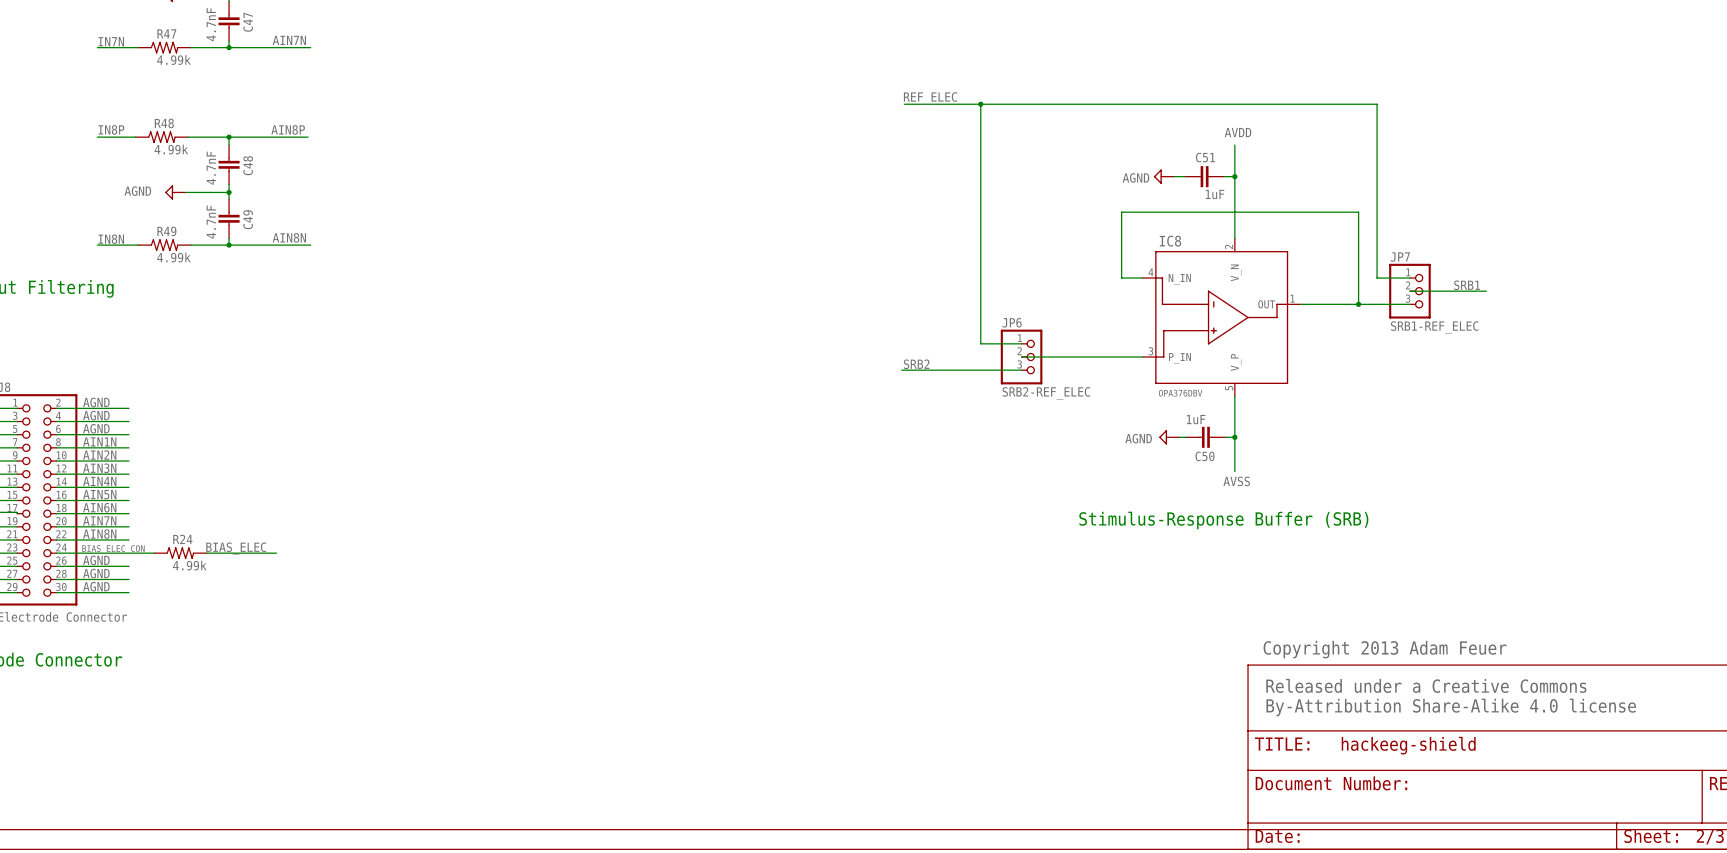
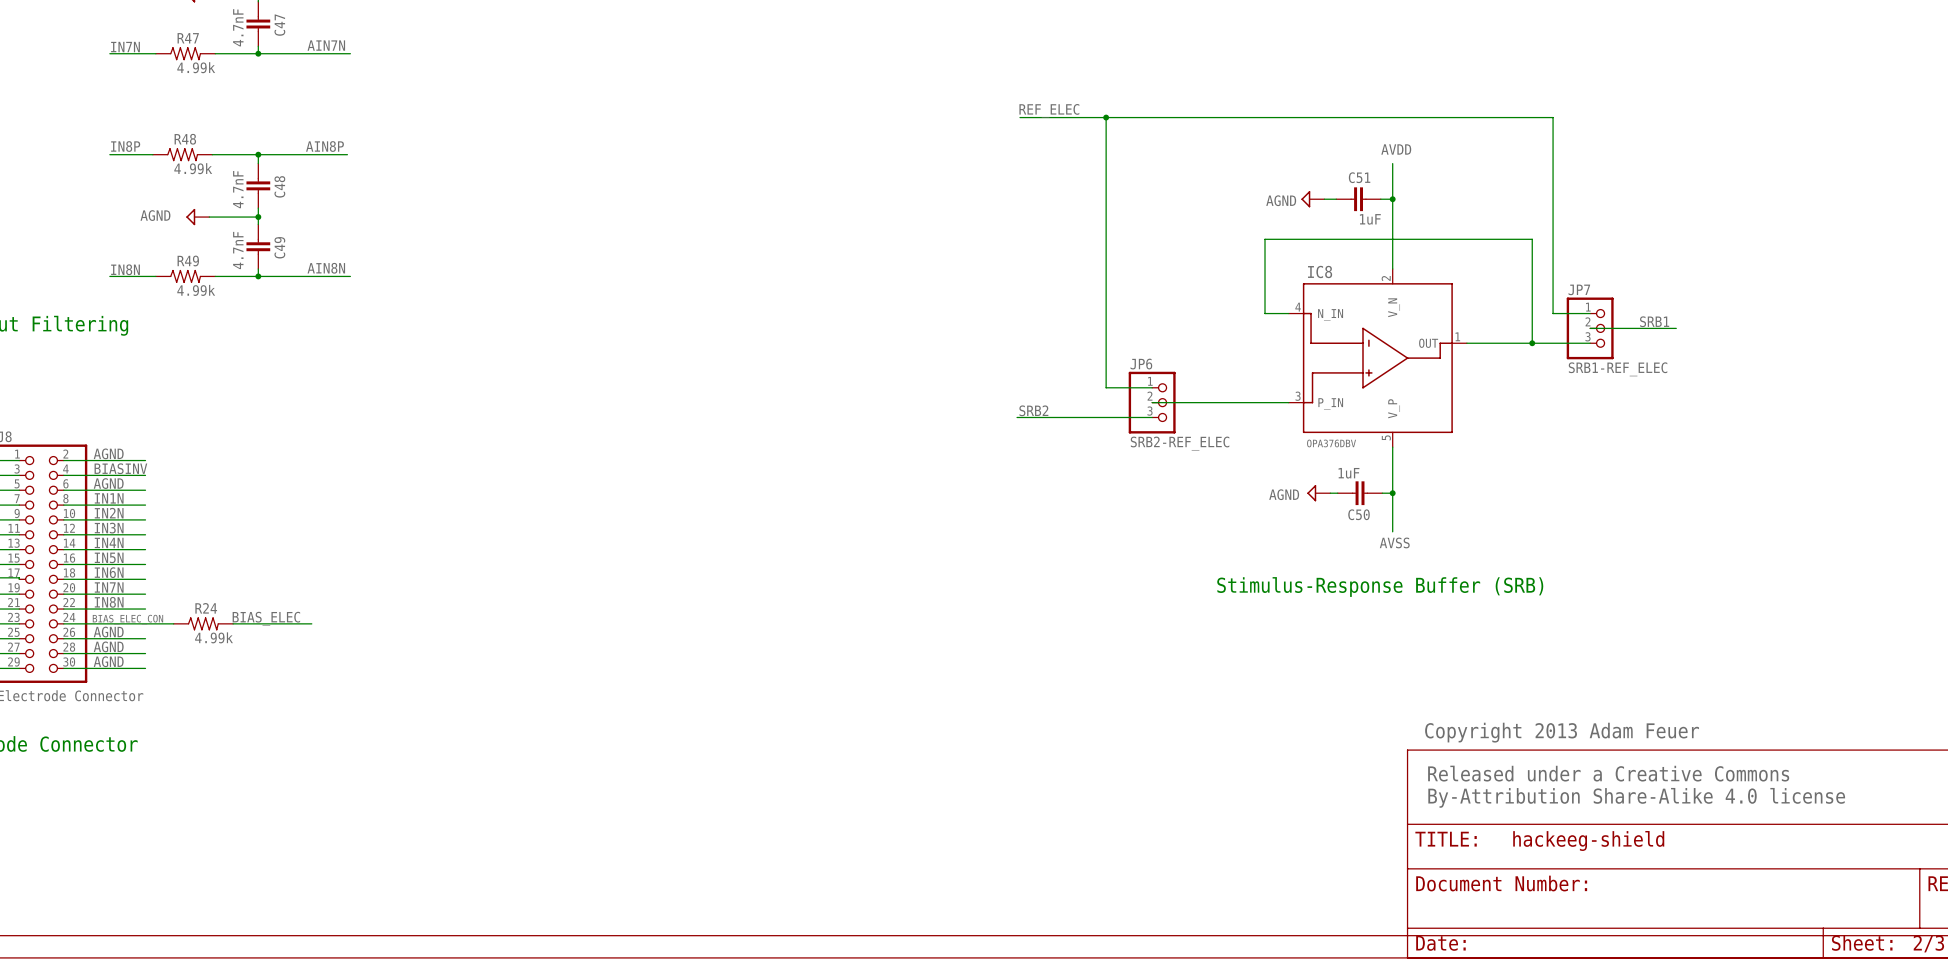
label: AGND (96, 415) -> BIASINV (120, 468)
label: AIN1N (99, 441) -> IN1N (109, 498)
label: AIN2N (99, 455) -> IN2N (109, 513)
label: AIN3N (99, 468) -> IN3N (109, 528)
label: AIN4N (99, 481) -> IN4N (109, 542)
label: AIN5N (99, 494) -> IN5N (109, 557)
label: AIN6N (99, 507) -> IN6N (109, 572)
label: AIN7N (99, 520) -> IN7N (109, 587)
label: AIN8N (99, 534) -> IN8N (109, 602)

